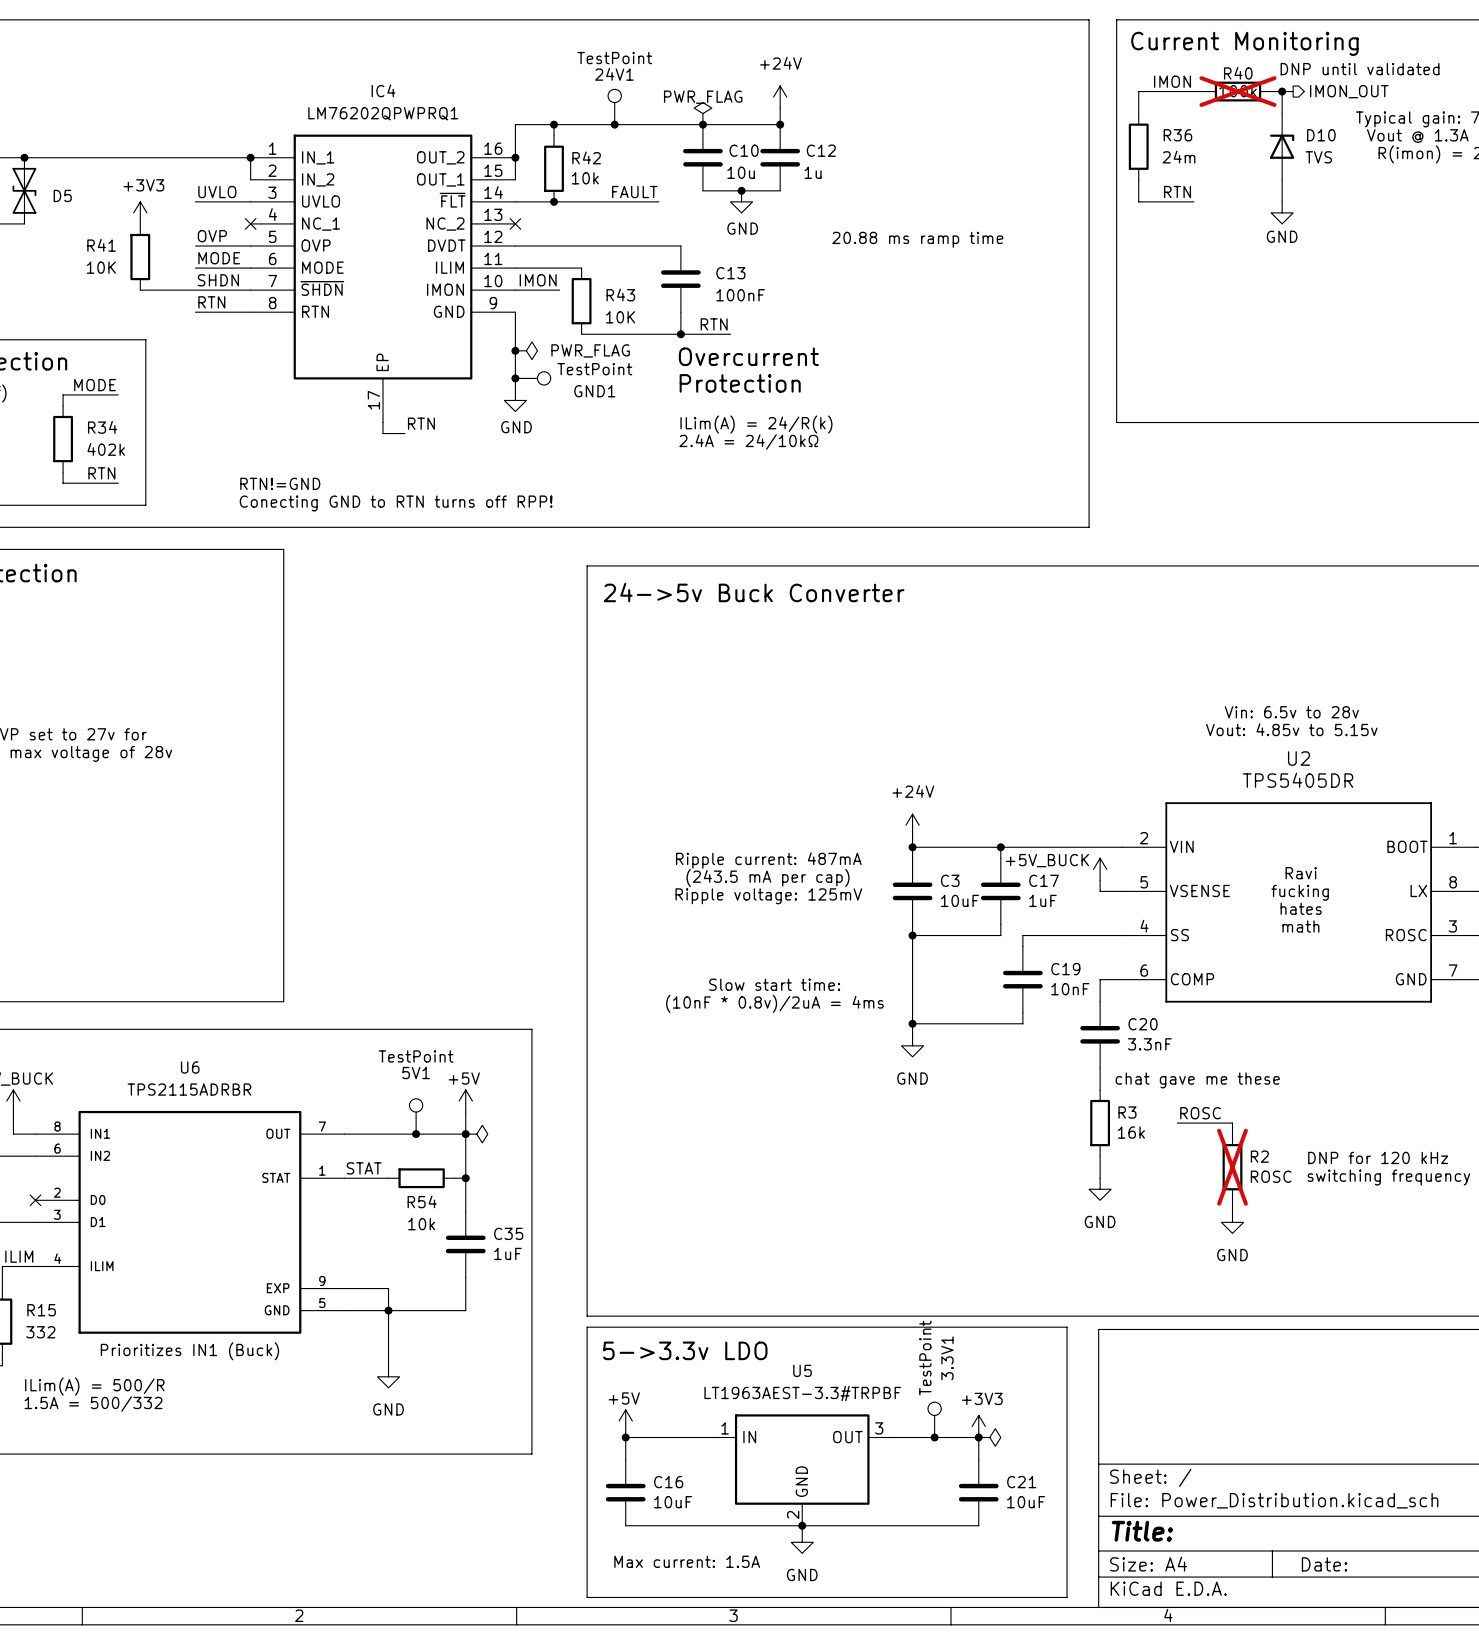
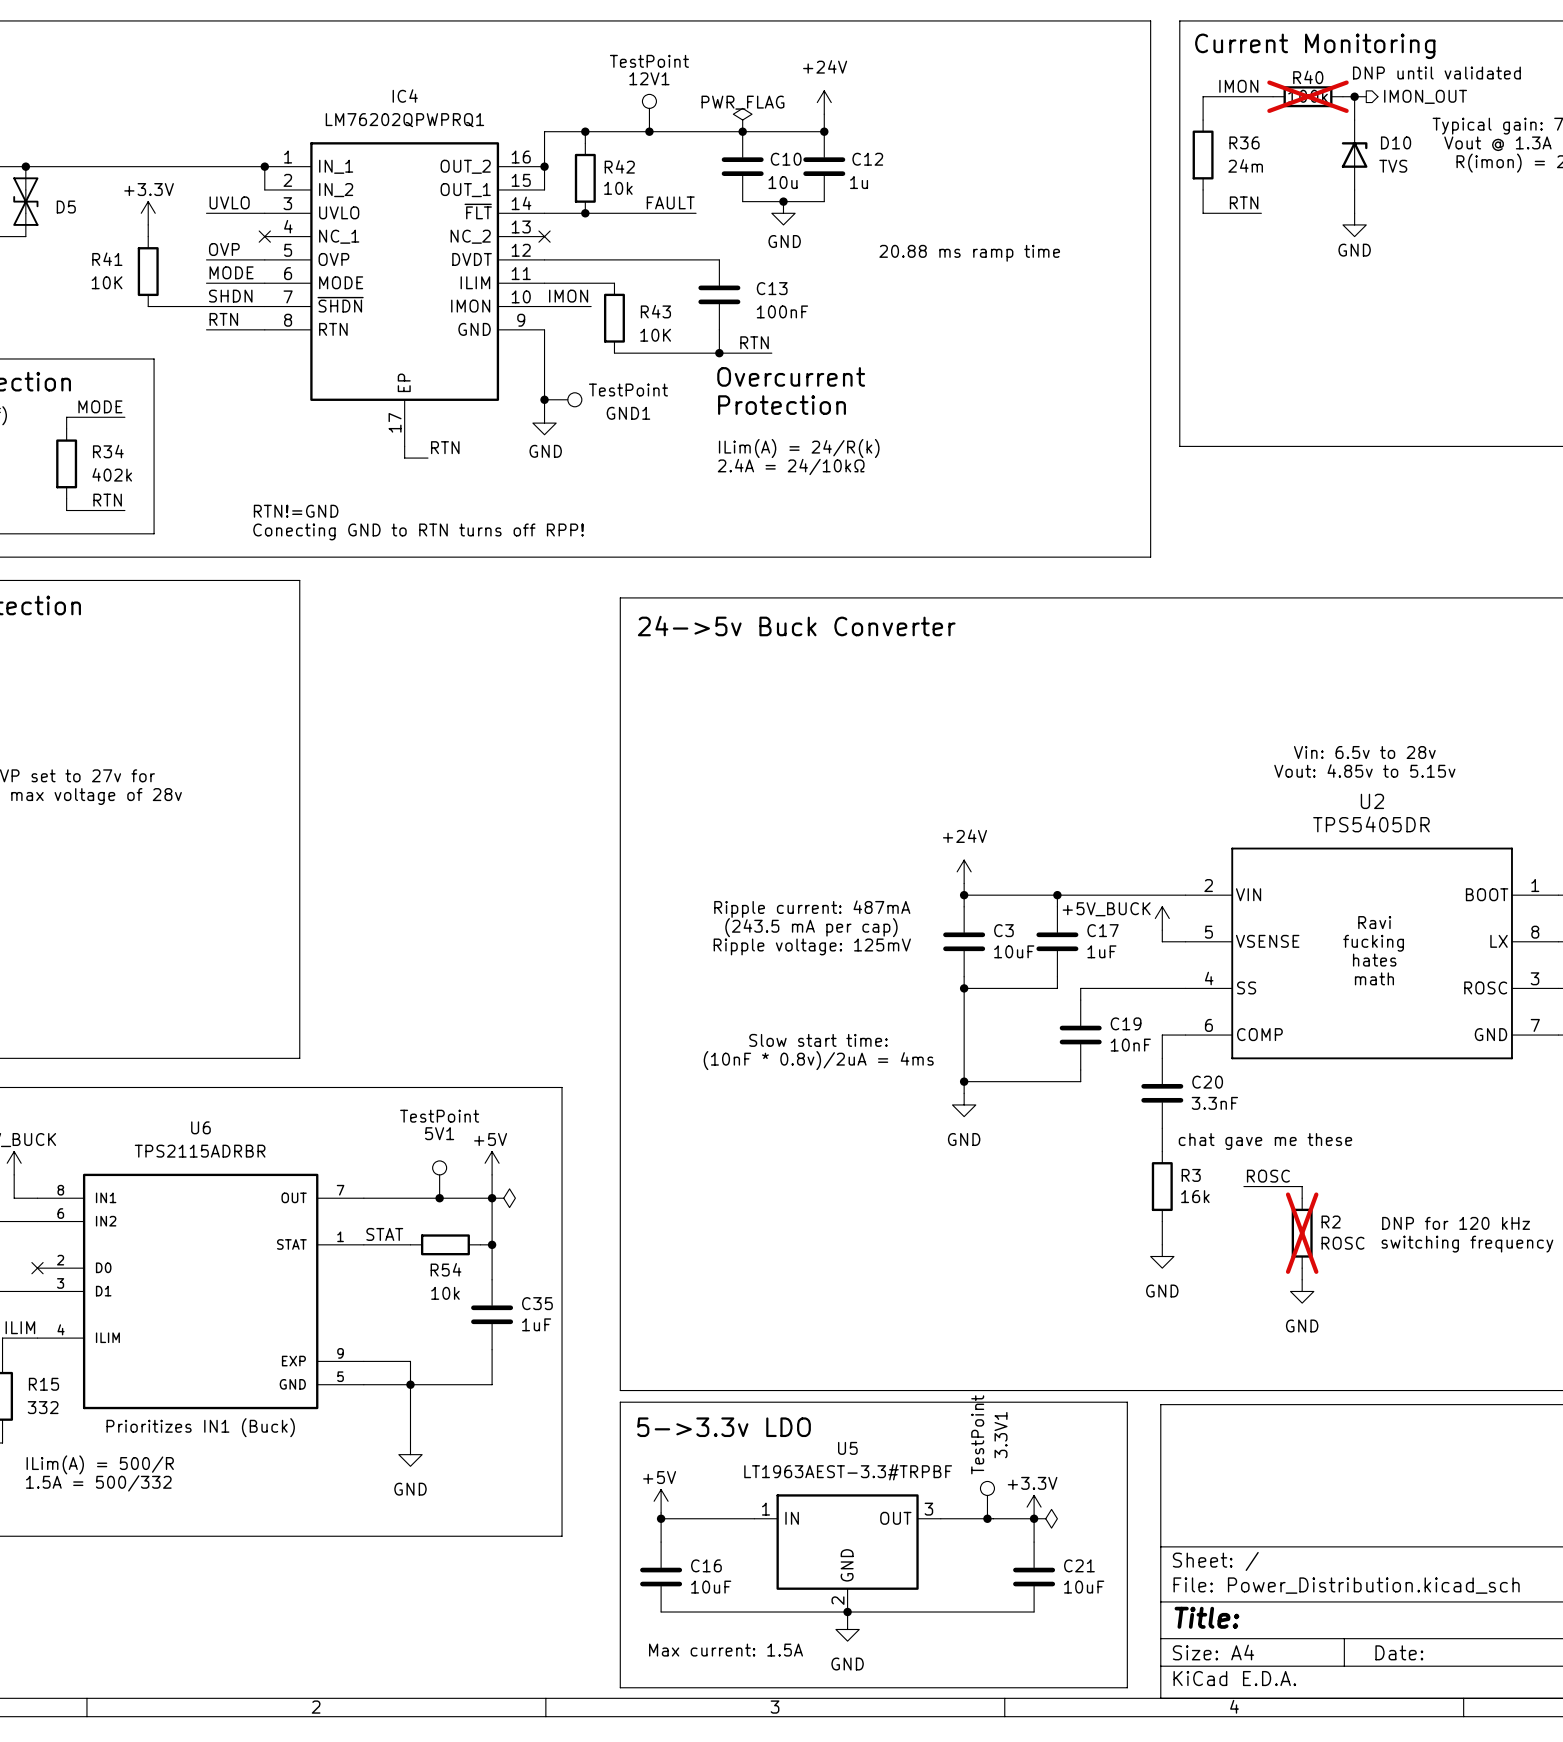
24V1 name: 24V1 (614, 74) -> 12V1 (649, 78)
power symbol: none -> +3.3V (148, 213)
power symbol: +3V3 (140, 212) -> none
junction: (515, 350) -> none
power symbol: PWR_FLAG (526, 350) -> none
power symbol: +3V3 (978, 1426) -> +3.3V (1034, 1507)

